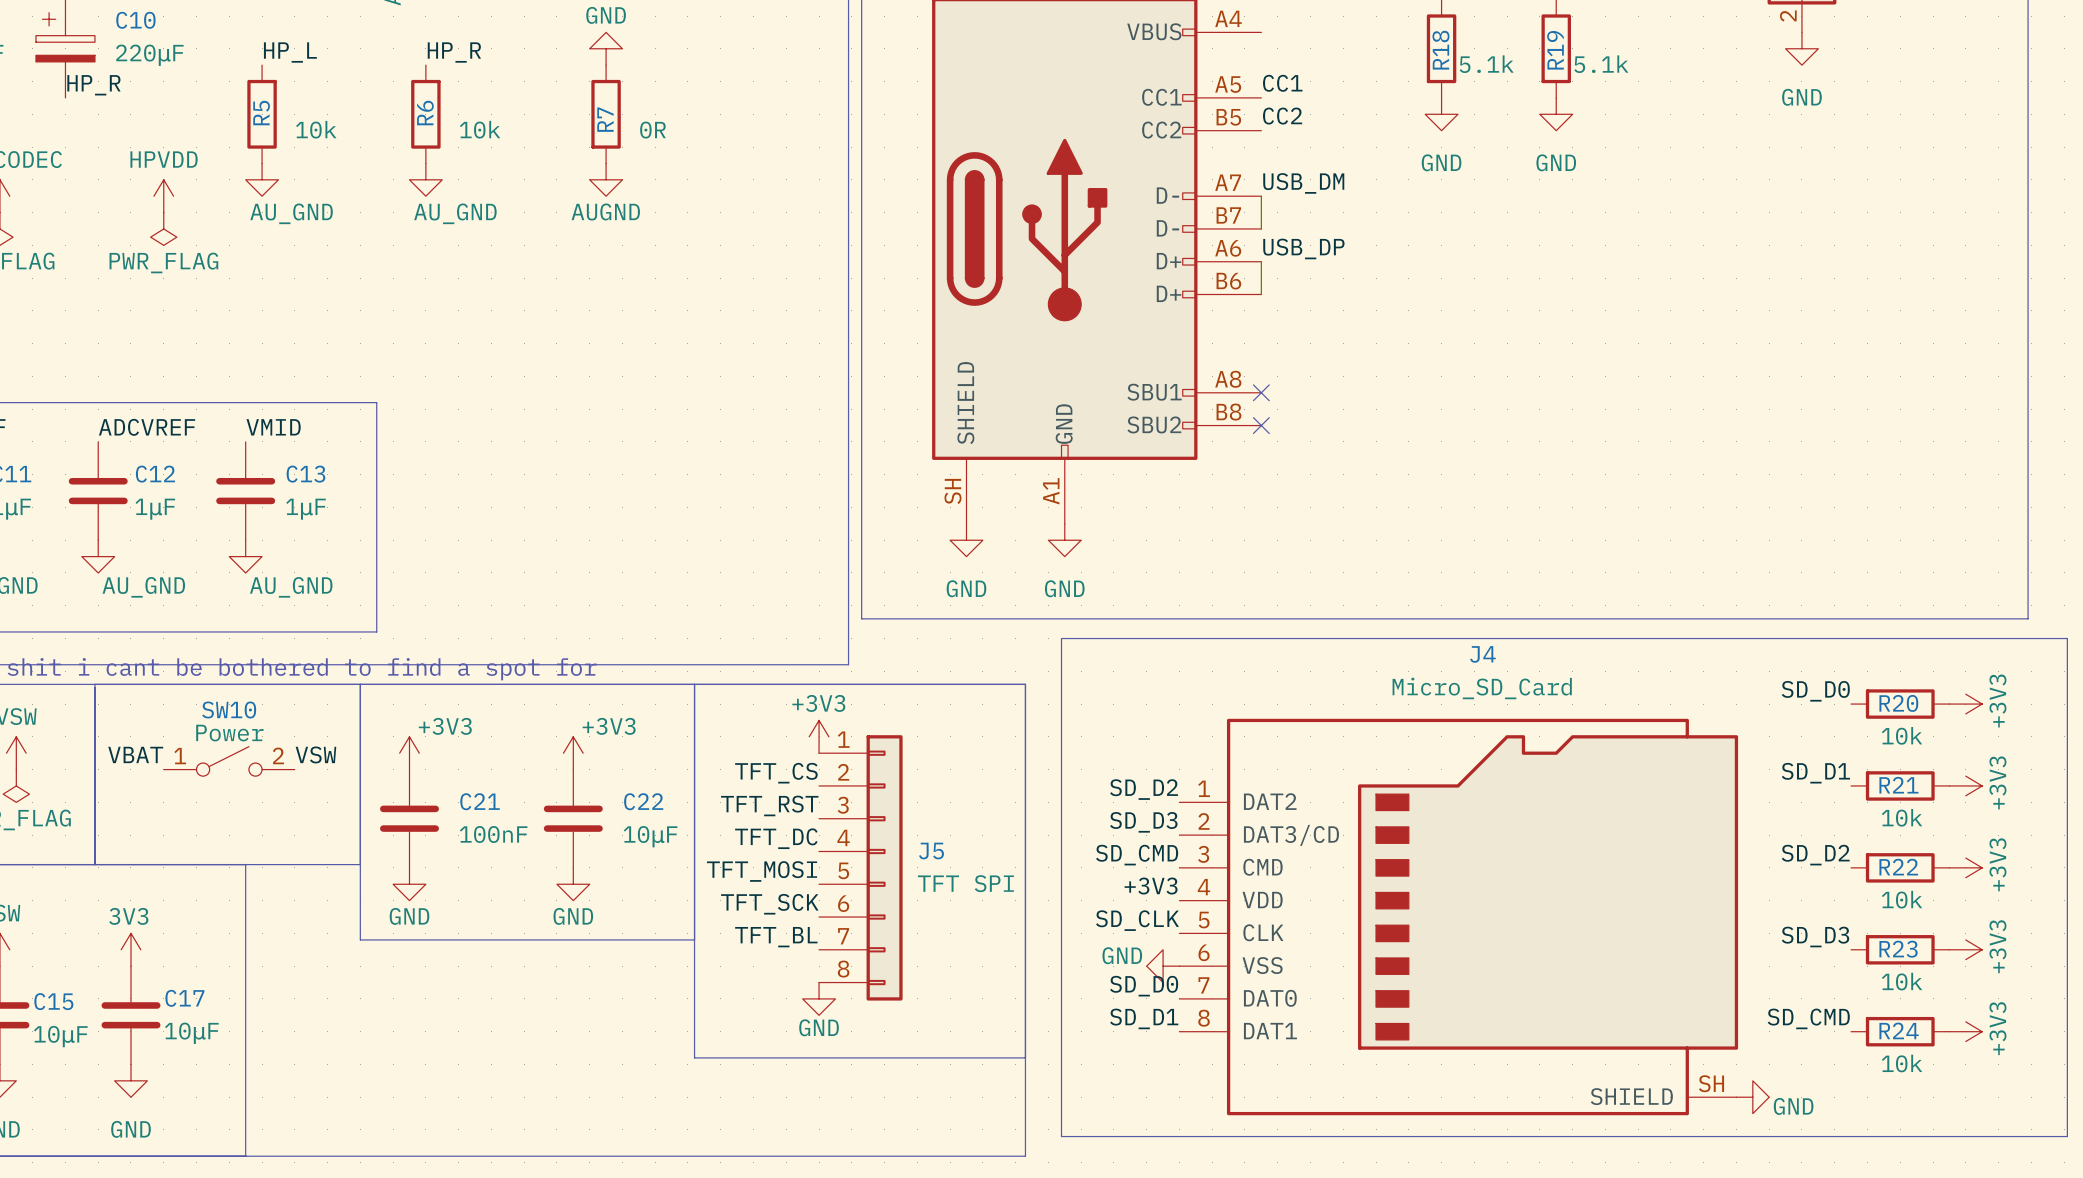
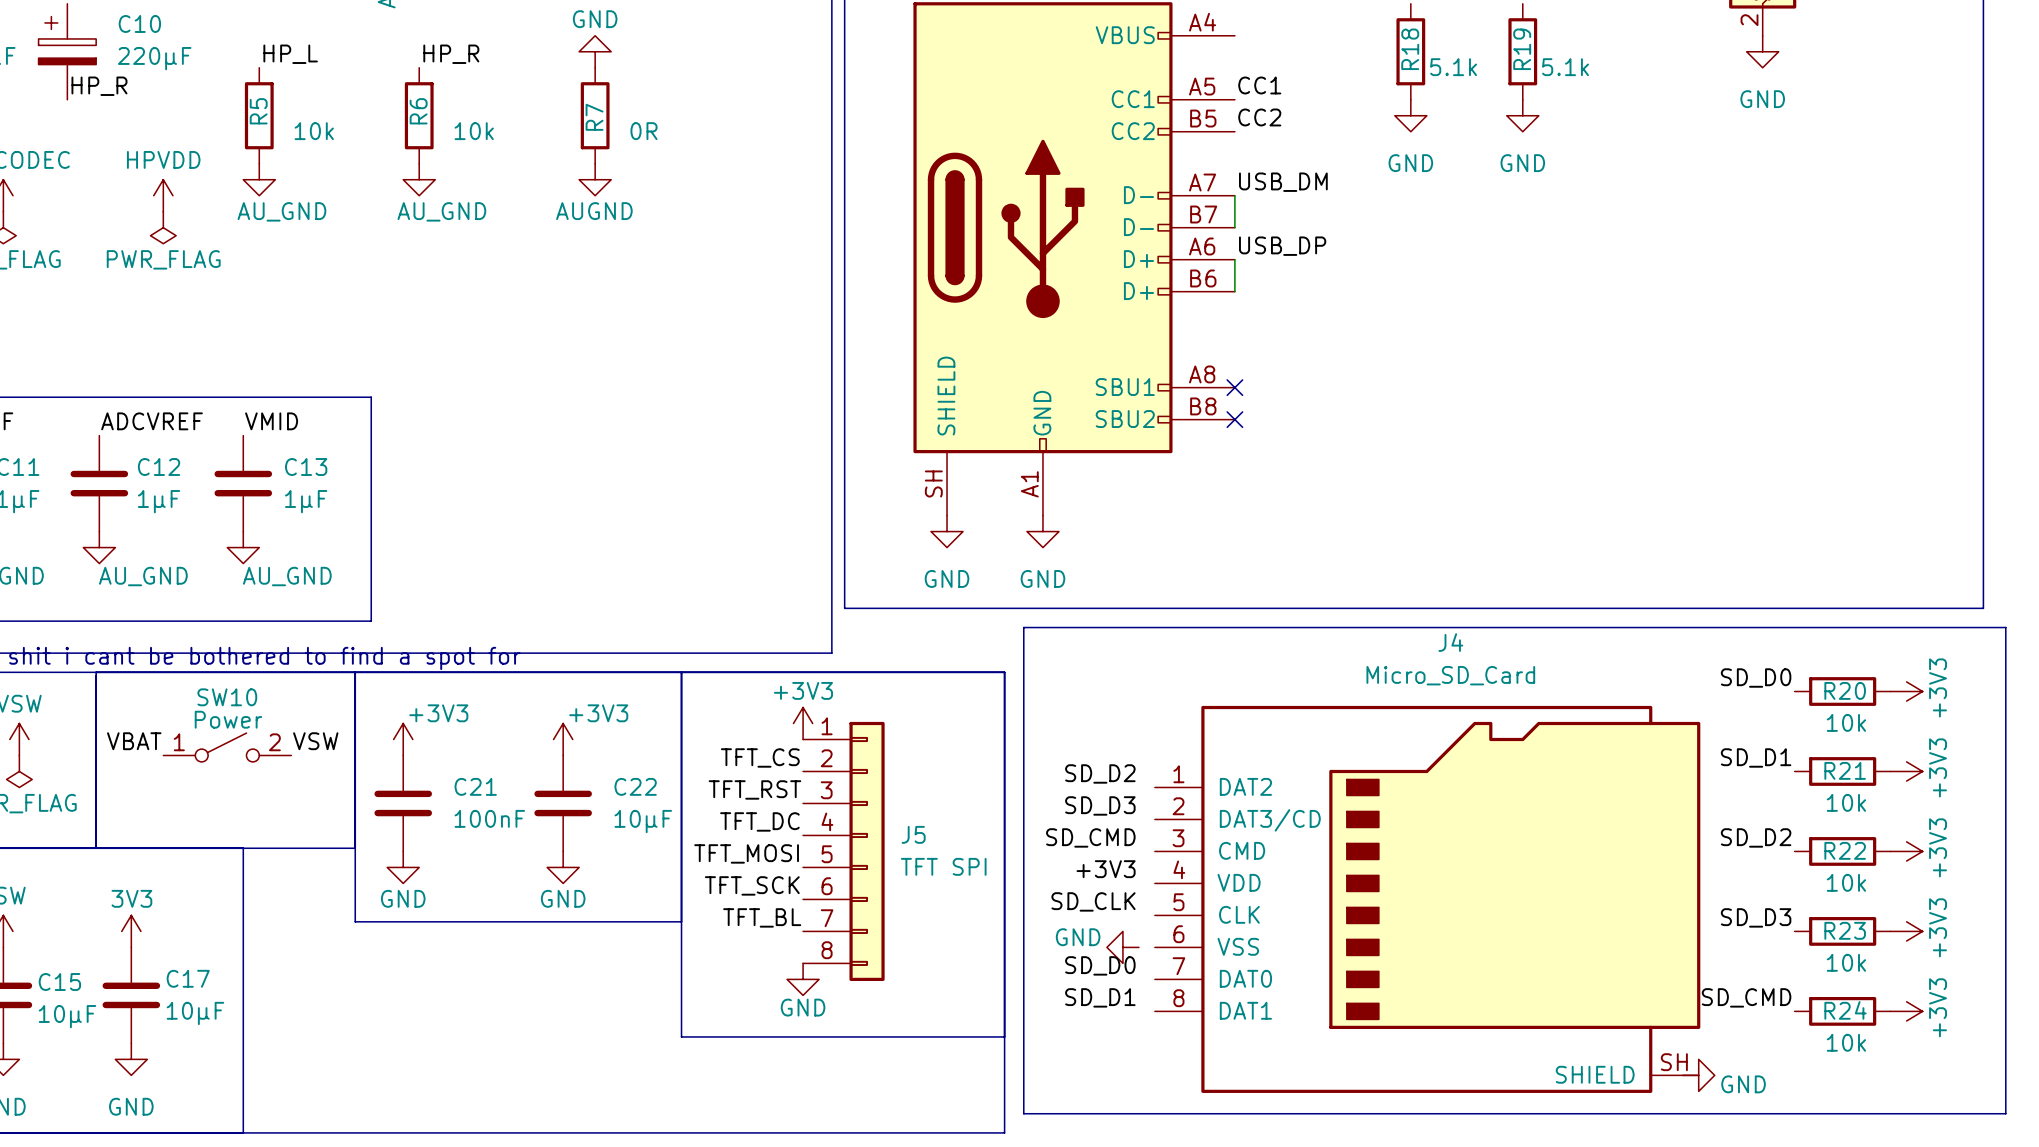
line: (1061, 638) (1061, 1136) -> (1039, 627) (1023, 627) (1023, 1113) (1039, 1113)
line: (2050, 638) (2067, 638) (2067, 1136) (2050, 1136) -> (2005, 627) (2005, 1113)
label position: SD_D0 (1815, 691) -> SD_D0 (1756, 678)
R20 position: (1900, 704) -> (1842, 691)
power symbol position: +3V3 (1965, 704) -> +3V3 (1906, 691)
label position: SD_D1 (1815, 773) -> SD_D1 (1756, 757)
R21 position: (1900, 785) -> (1842, 771)
power symbol position: +3V3 (1965, 785) -> +3V3 (1906, 771)
label position: SD_D2 (1144, 789) -> SD_D2 (1100, 773)
label position: SD_D3 (1143, 822) -> SD_D3 (1100, 805)
label position: SD_CMD (1137, 855) -> SD_CMD (1090, 837)
label position: SD_D2 (1815, 855) -> SD_D2 (1756, 837)
R22 position: (1900, 867) -> (1842, 851)
power symbol position: +3V3 (1965, 867) -> +3V3 (1906, 851)
label position: +3V3 (1151, 886) -> +3V3 (1106, 869)
label position: SD_CLK (1137, 920) -> SD_CLK (1093, 901)
label position: SD_D3 (1815, 937) -> SD_D3 (1756, 917)
R23 position: (1900, 949) -> (1842, 931)
power symbol position: +3V3 (1965, 949) -> +3V3 (1906, 931)
power symbol position: GND (1163, 966) -> GND (1122, 947)
label position: SD_D0 (1144, 986) -> SD_D0 (1100, 965)
label position: SD_D1 (1144, 1018) -> SD_D1 (1100, 997)
label position: SD_CMD (1808, 1018) -> SD_CMD (1746, 997)
R24 position: (1900, 1031) -> (1842, 1011)
power symbol position: +3V3 (1965, 1031) -> +3V3 (1906, 1011)
power symbol position: GND (1752, 1097) -> GND (1698, 1075)

